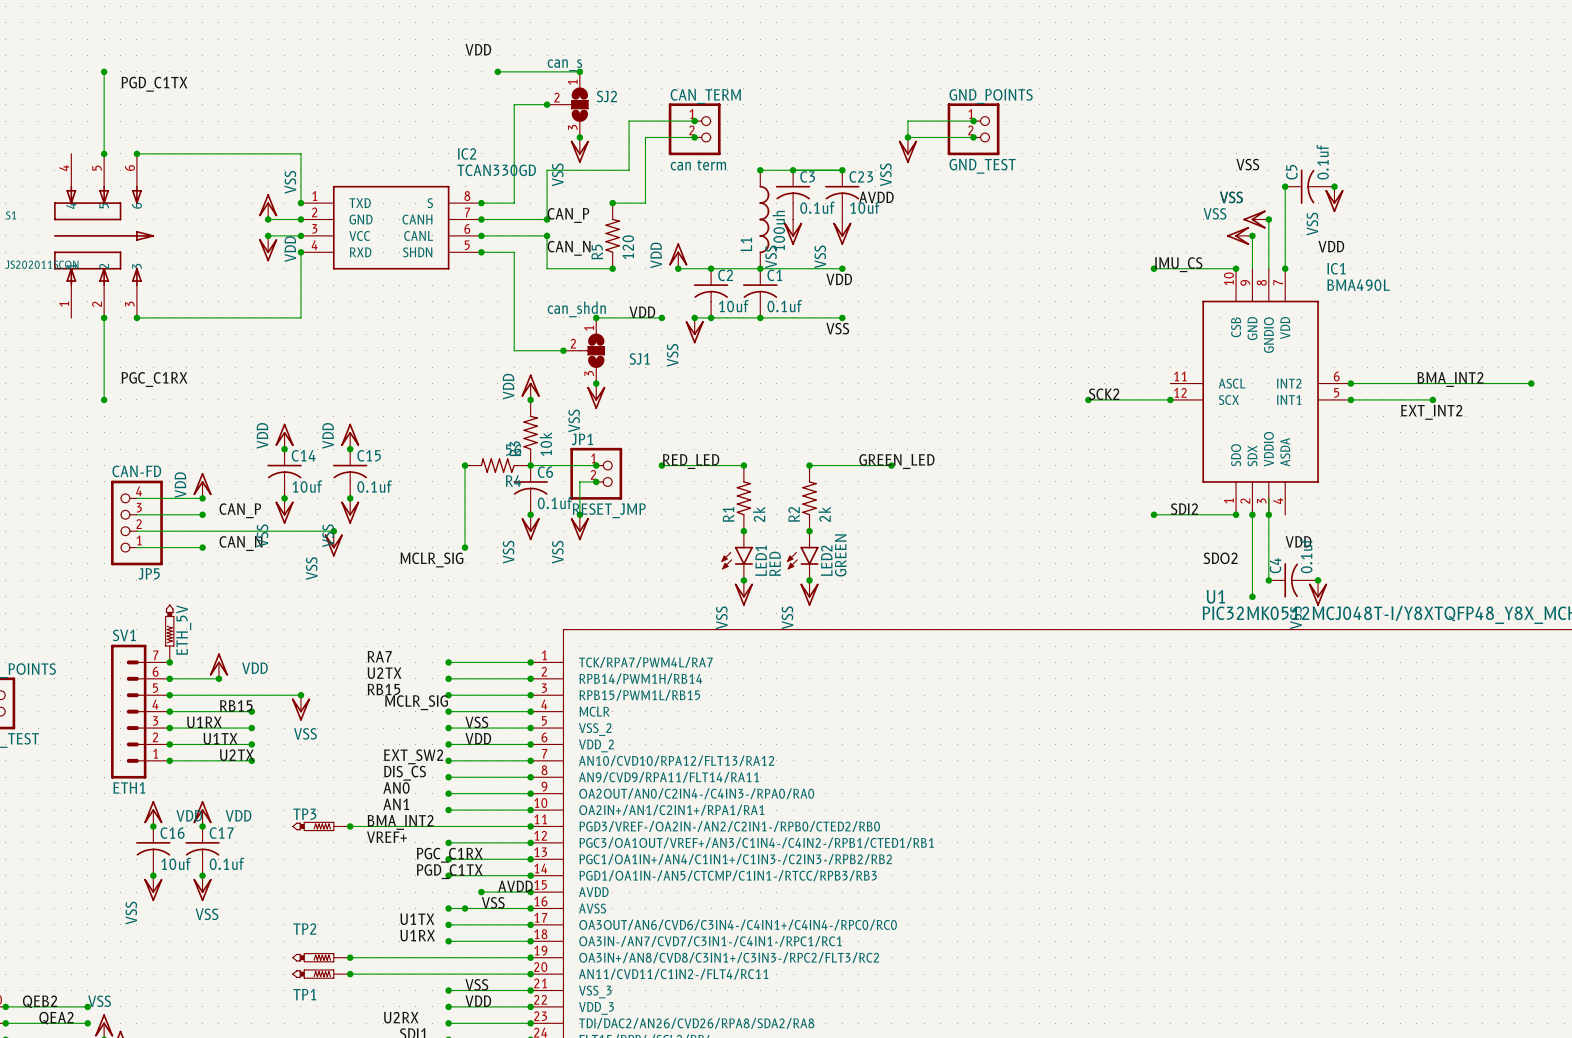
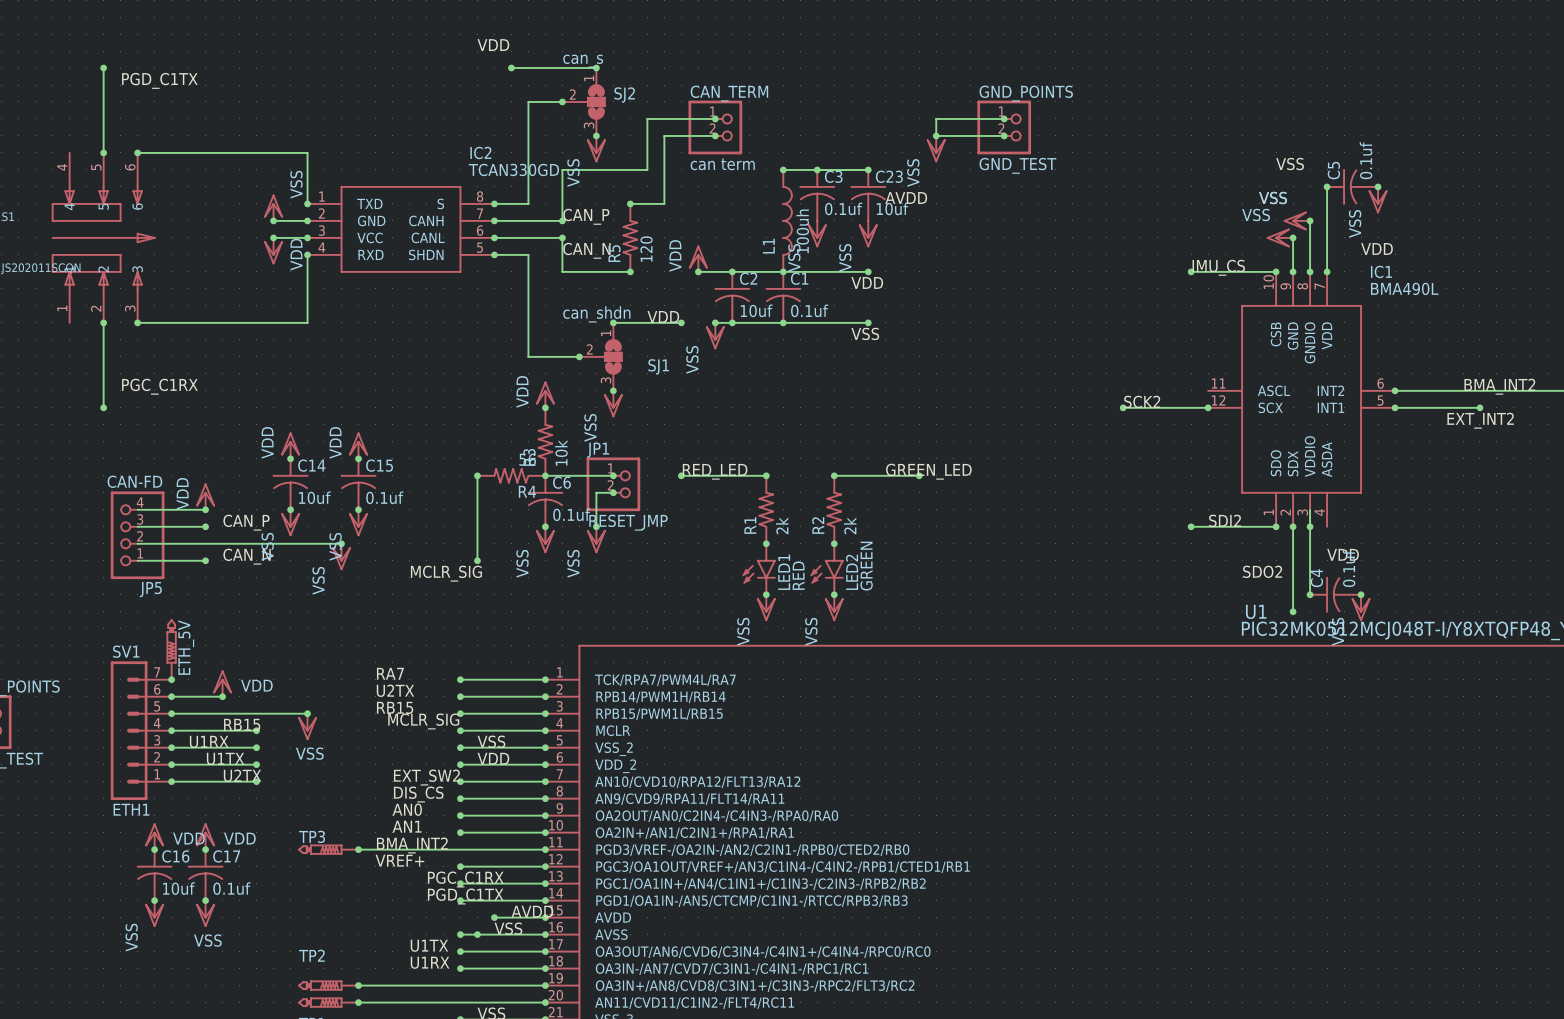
junction: none -> (1293, 271)
junction: none -> (1310, 271)

